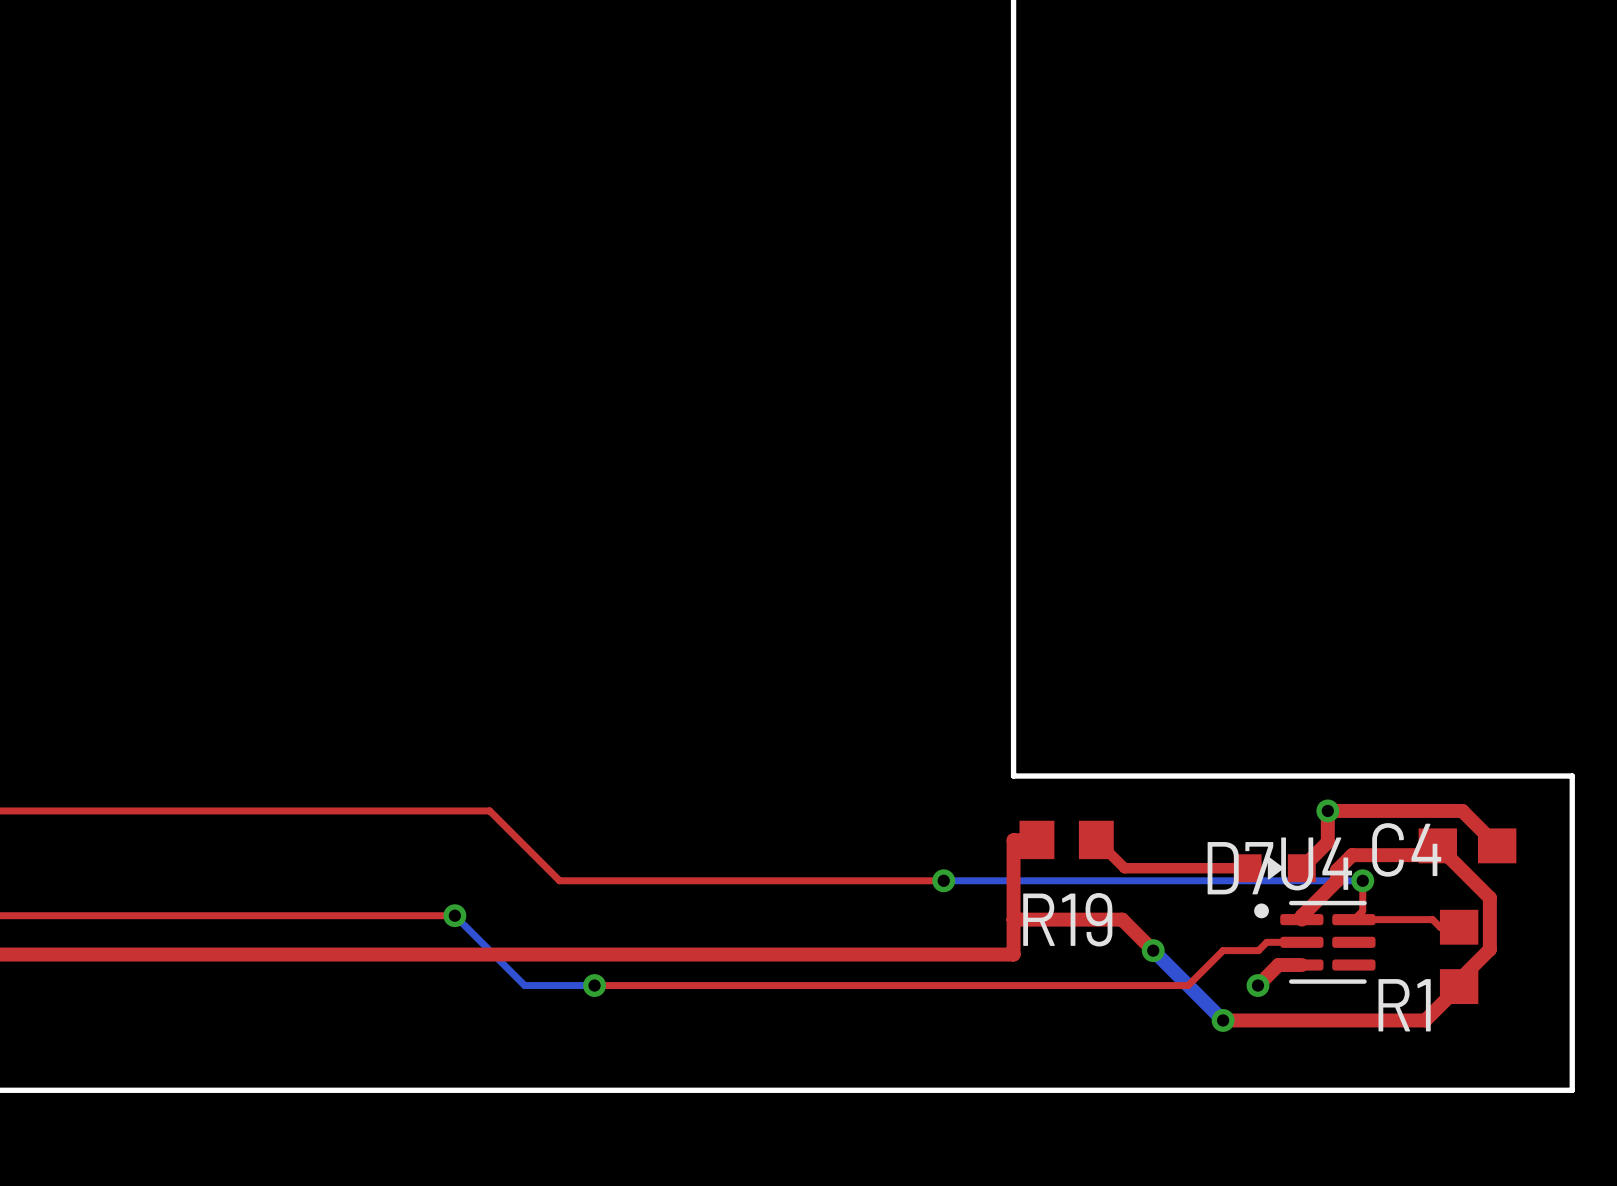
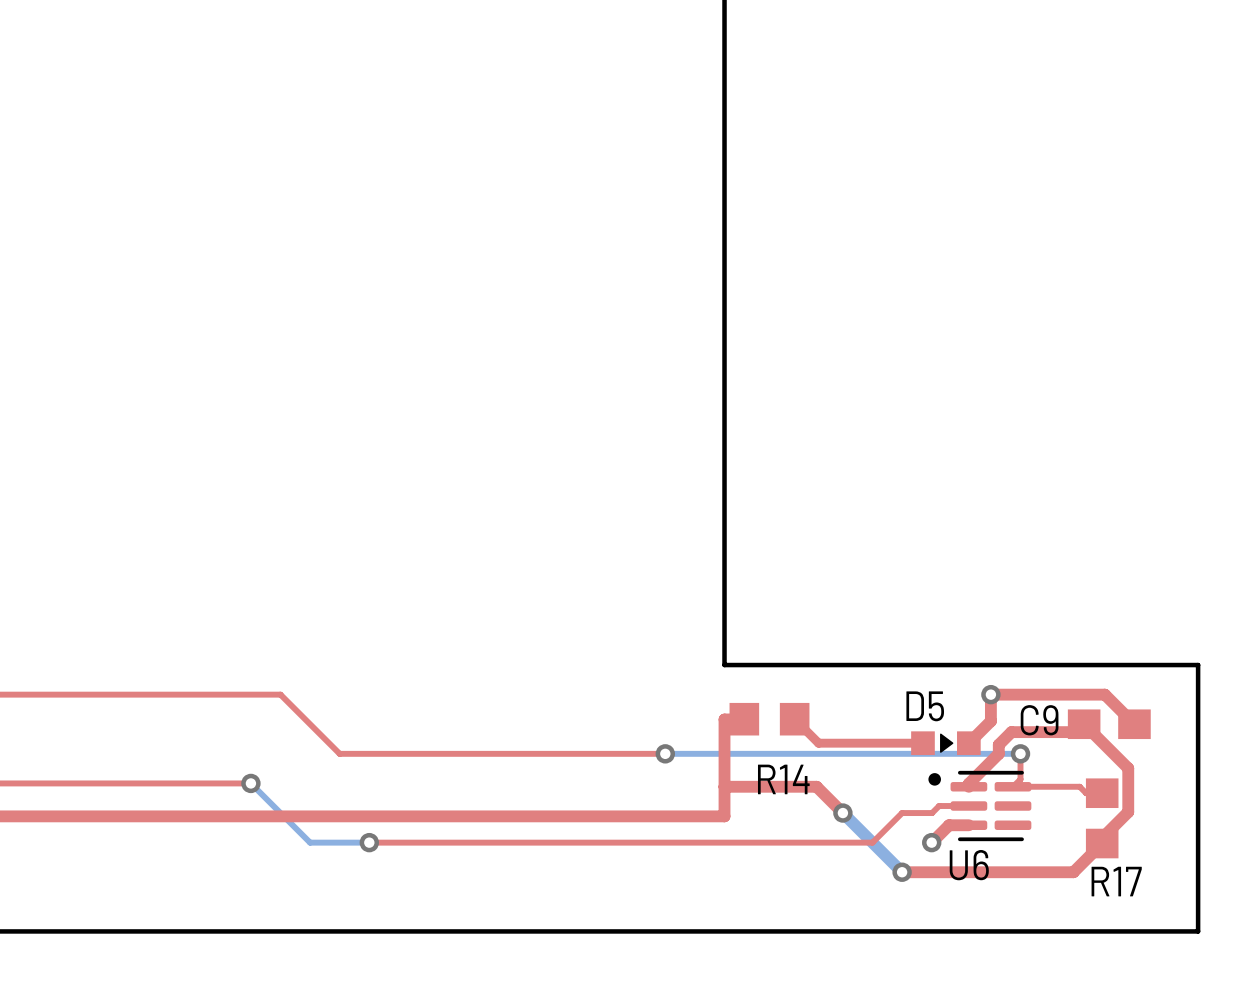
C4 name: C4 (1406, 849) -> C9 (1039, 720)
U4 name: U4 (1316, 863) -> U6 (969, 865)
D7 name: D7 (1240, 868) -> D5 (925, 706)
R19 name: R19 (1067, 919) -> R14 (783, 779)
R1 name: R1 (1404, 1005) -> R17 (1116, 881)

